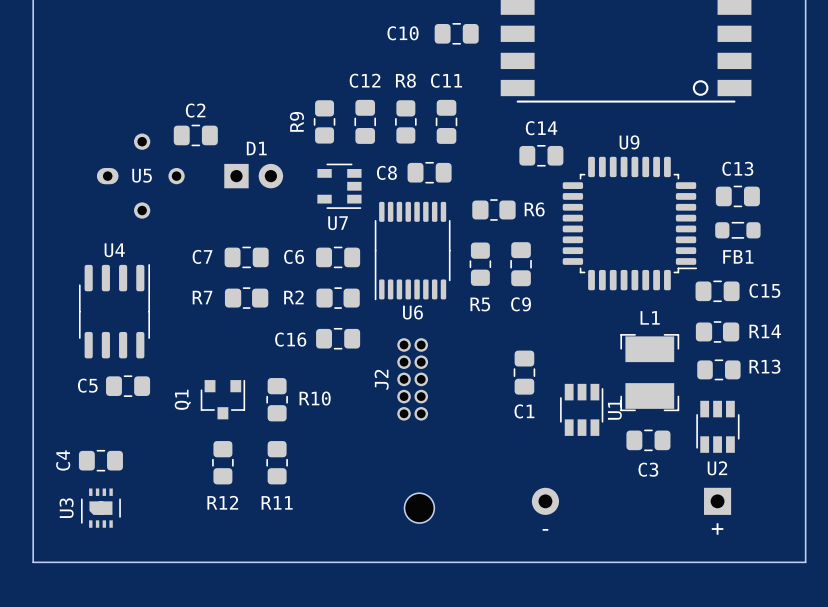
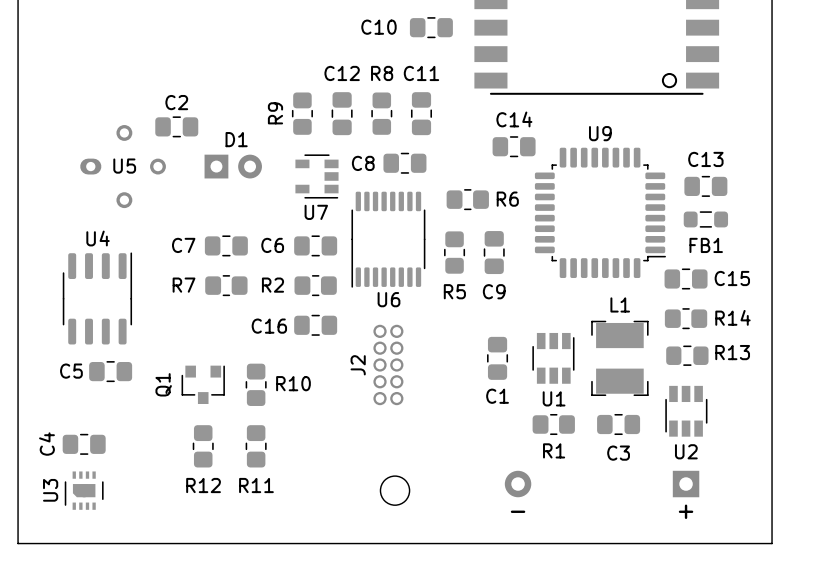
U1 position: (581, 409) -> (553, 358)
U1 name rotation: 0° (614, 409) -> 90° clockwise (554, 398)
R1: none -> (553, 424)

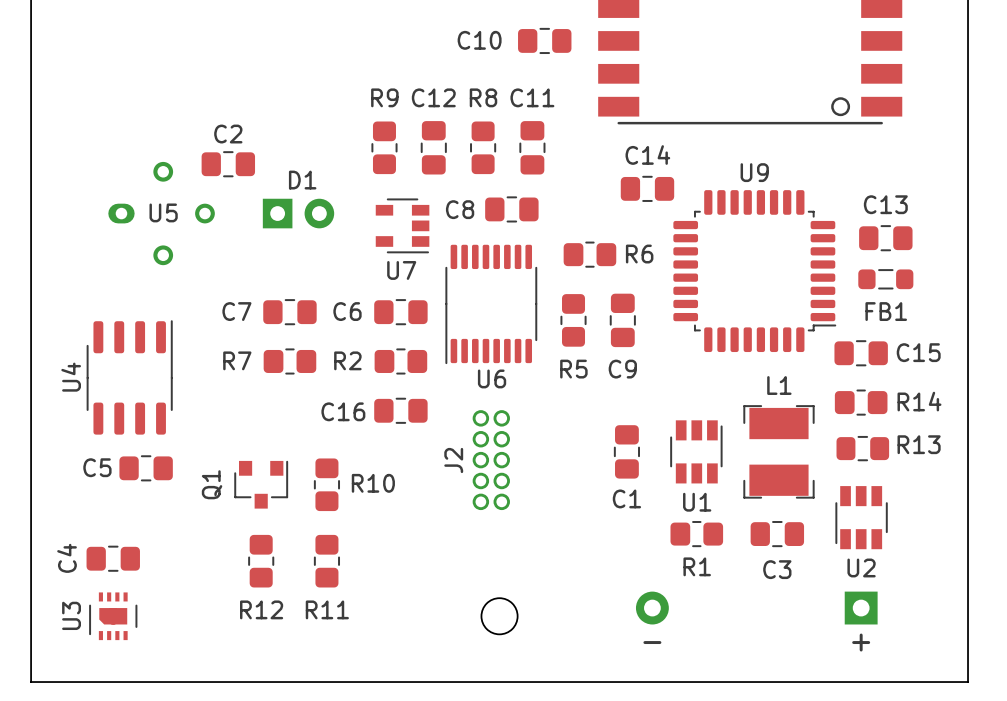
R9 name rotation: 0° (275, 113) -> 90° clockwise (384, 97)
R9 name position: R9 (275, 113) -> R9 (384, 97)
U4 name rotation: 0° (98, 238) -> 90° counterclockwise (71, 377)
U4 name position: U4 (98, 238) -> U4 (71, 377)

